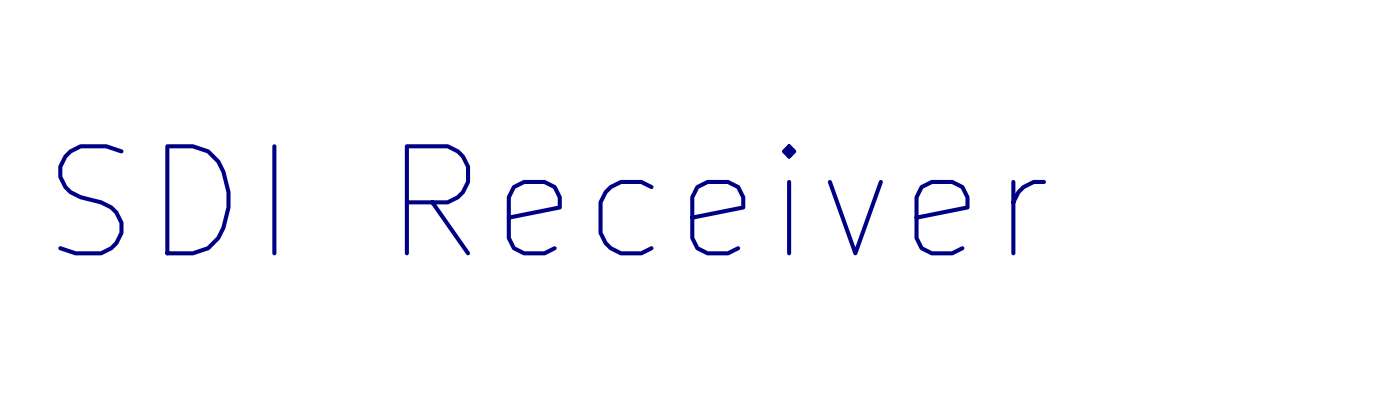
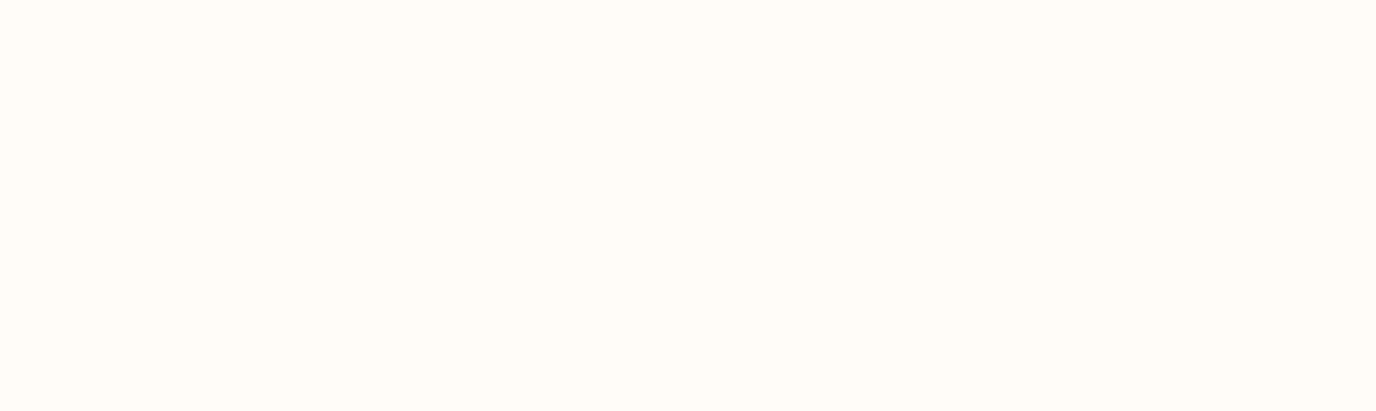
text: SDI Receiver (552, 199) -> none

